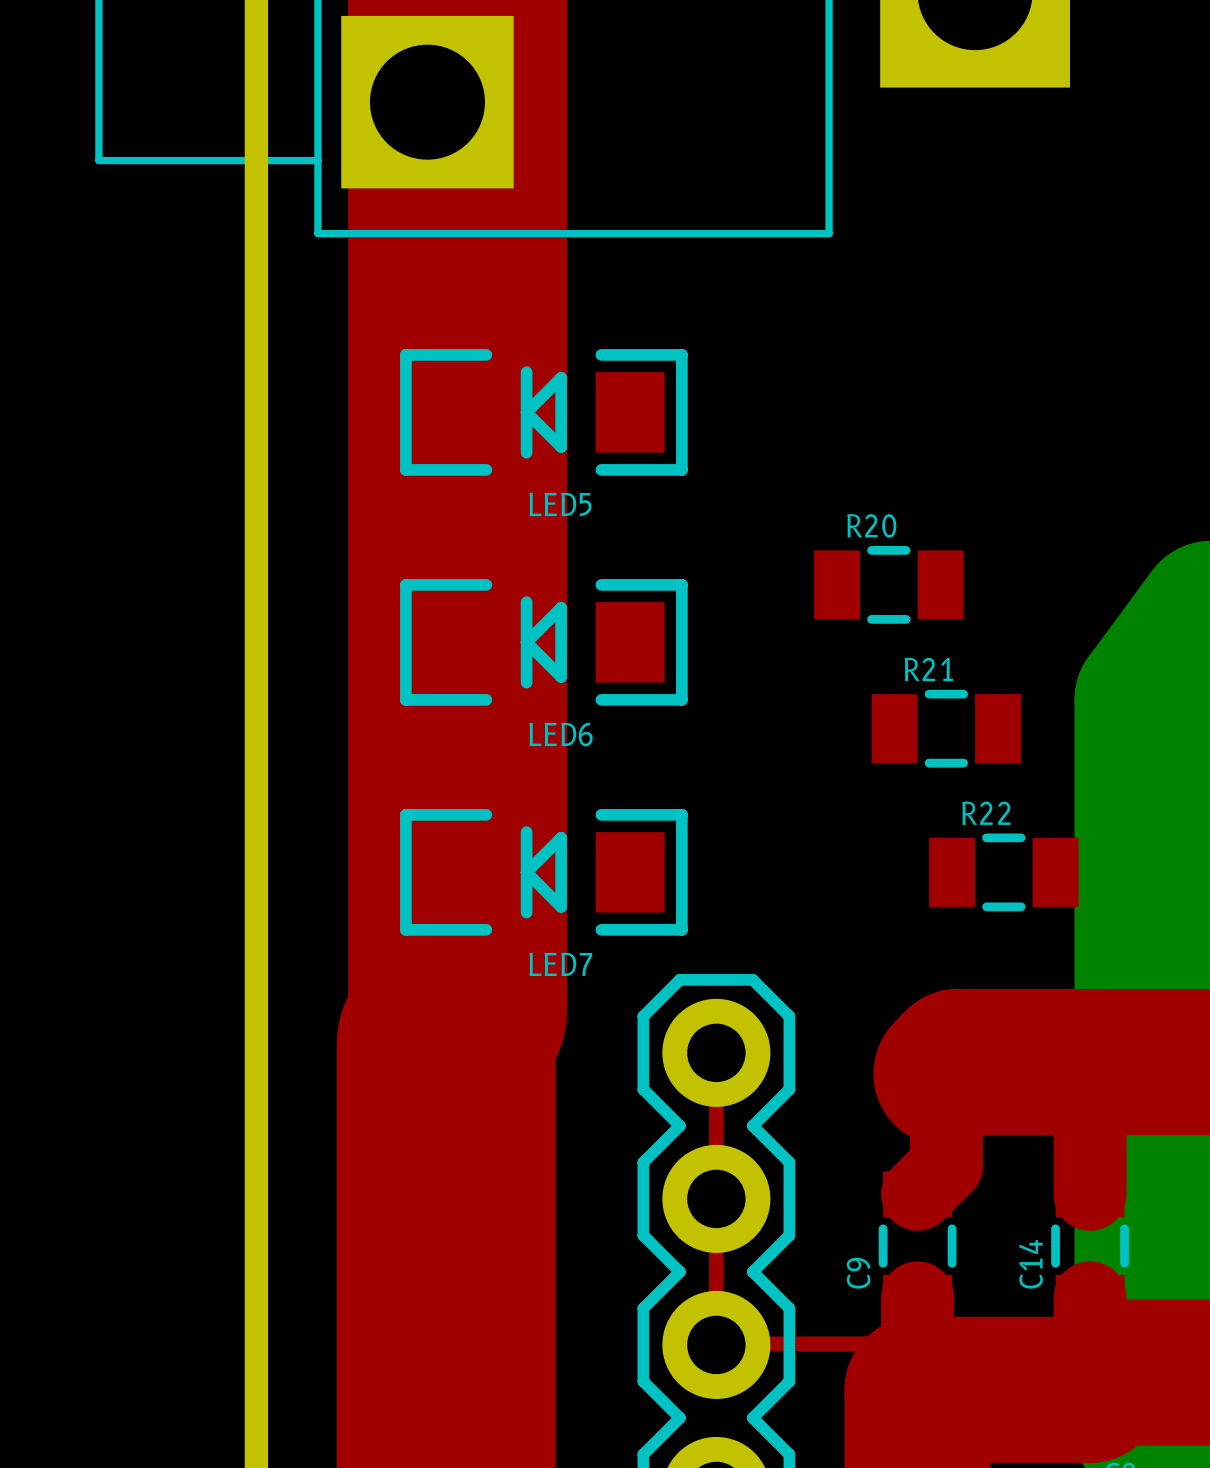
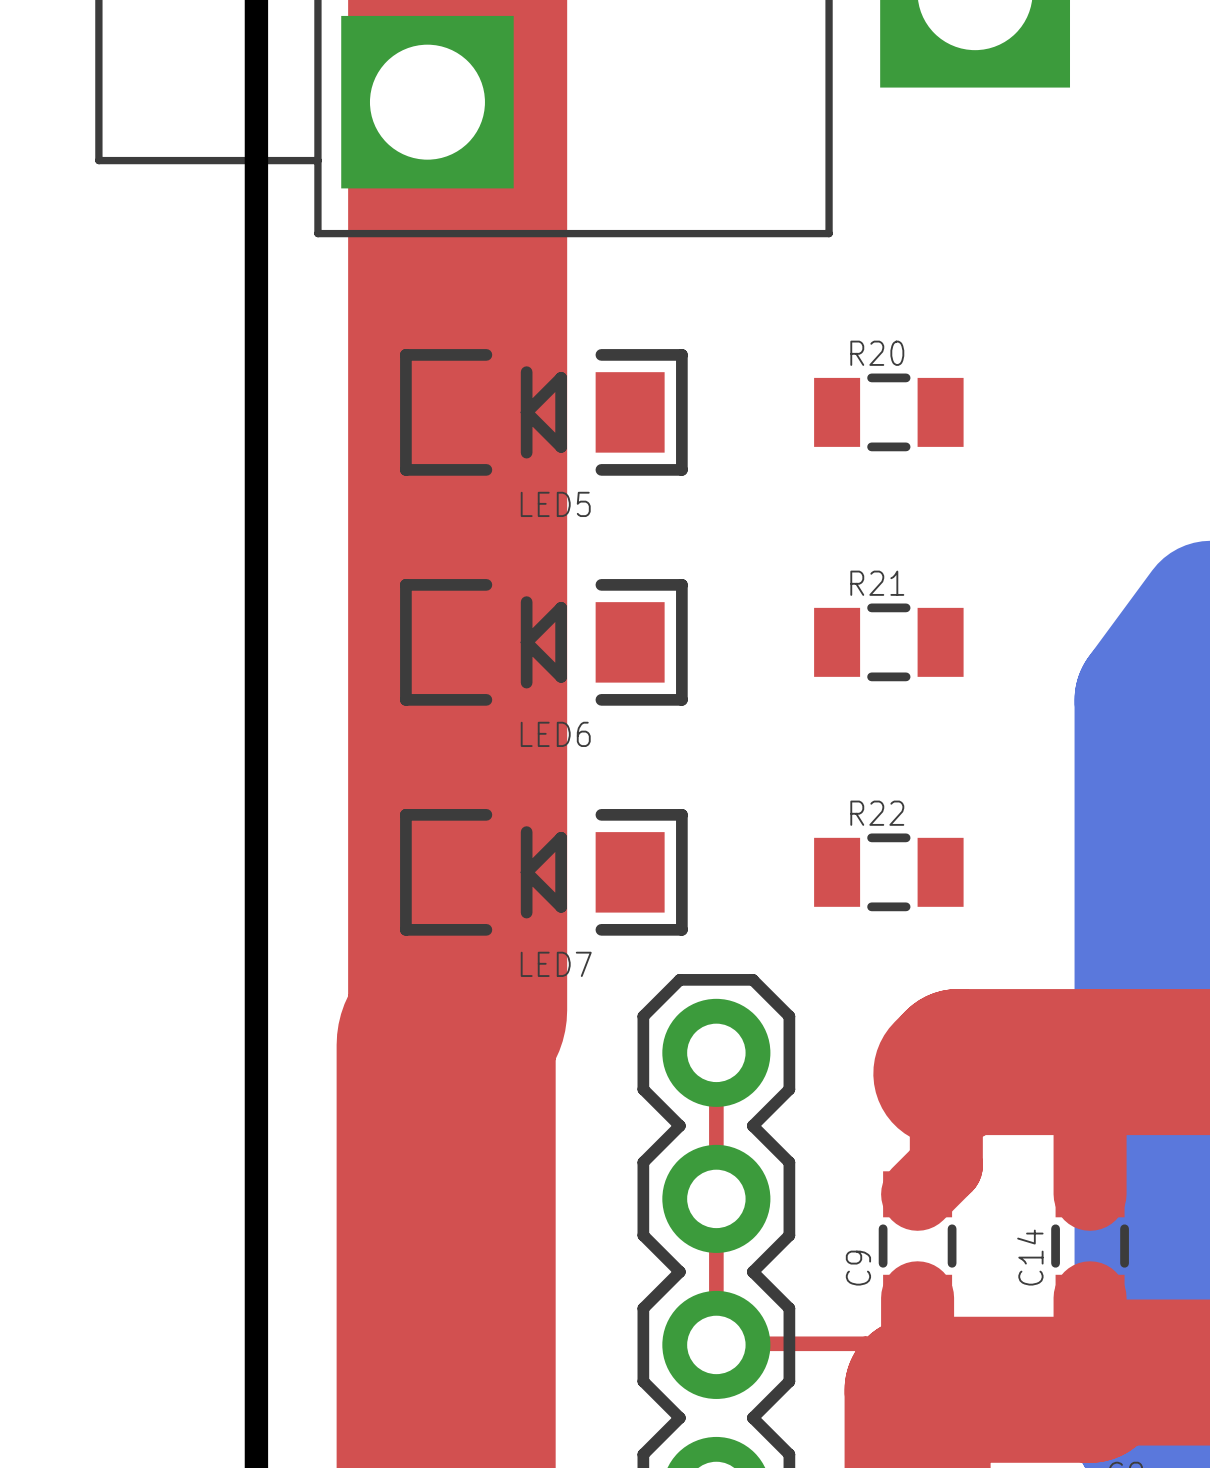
R20 position: (888, 584) -> (888, 412)
R21 position: (946, 728) -> (888, 642)
R22 position: (1003, 872) -> (888, 872)

